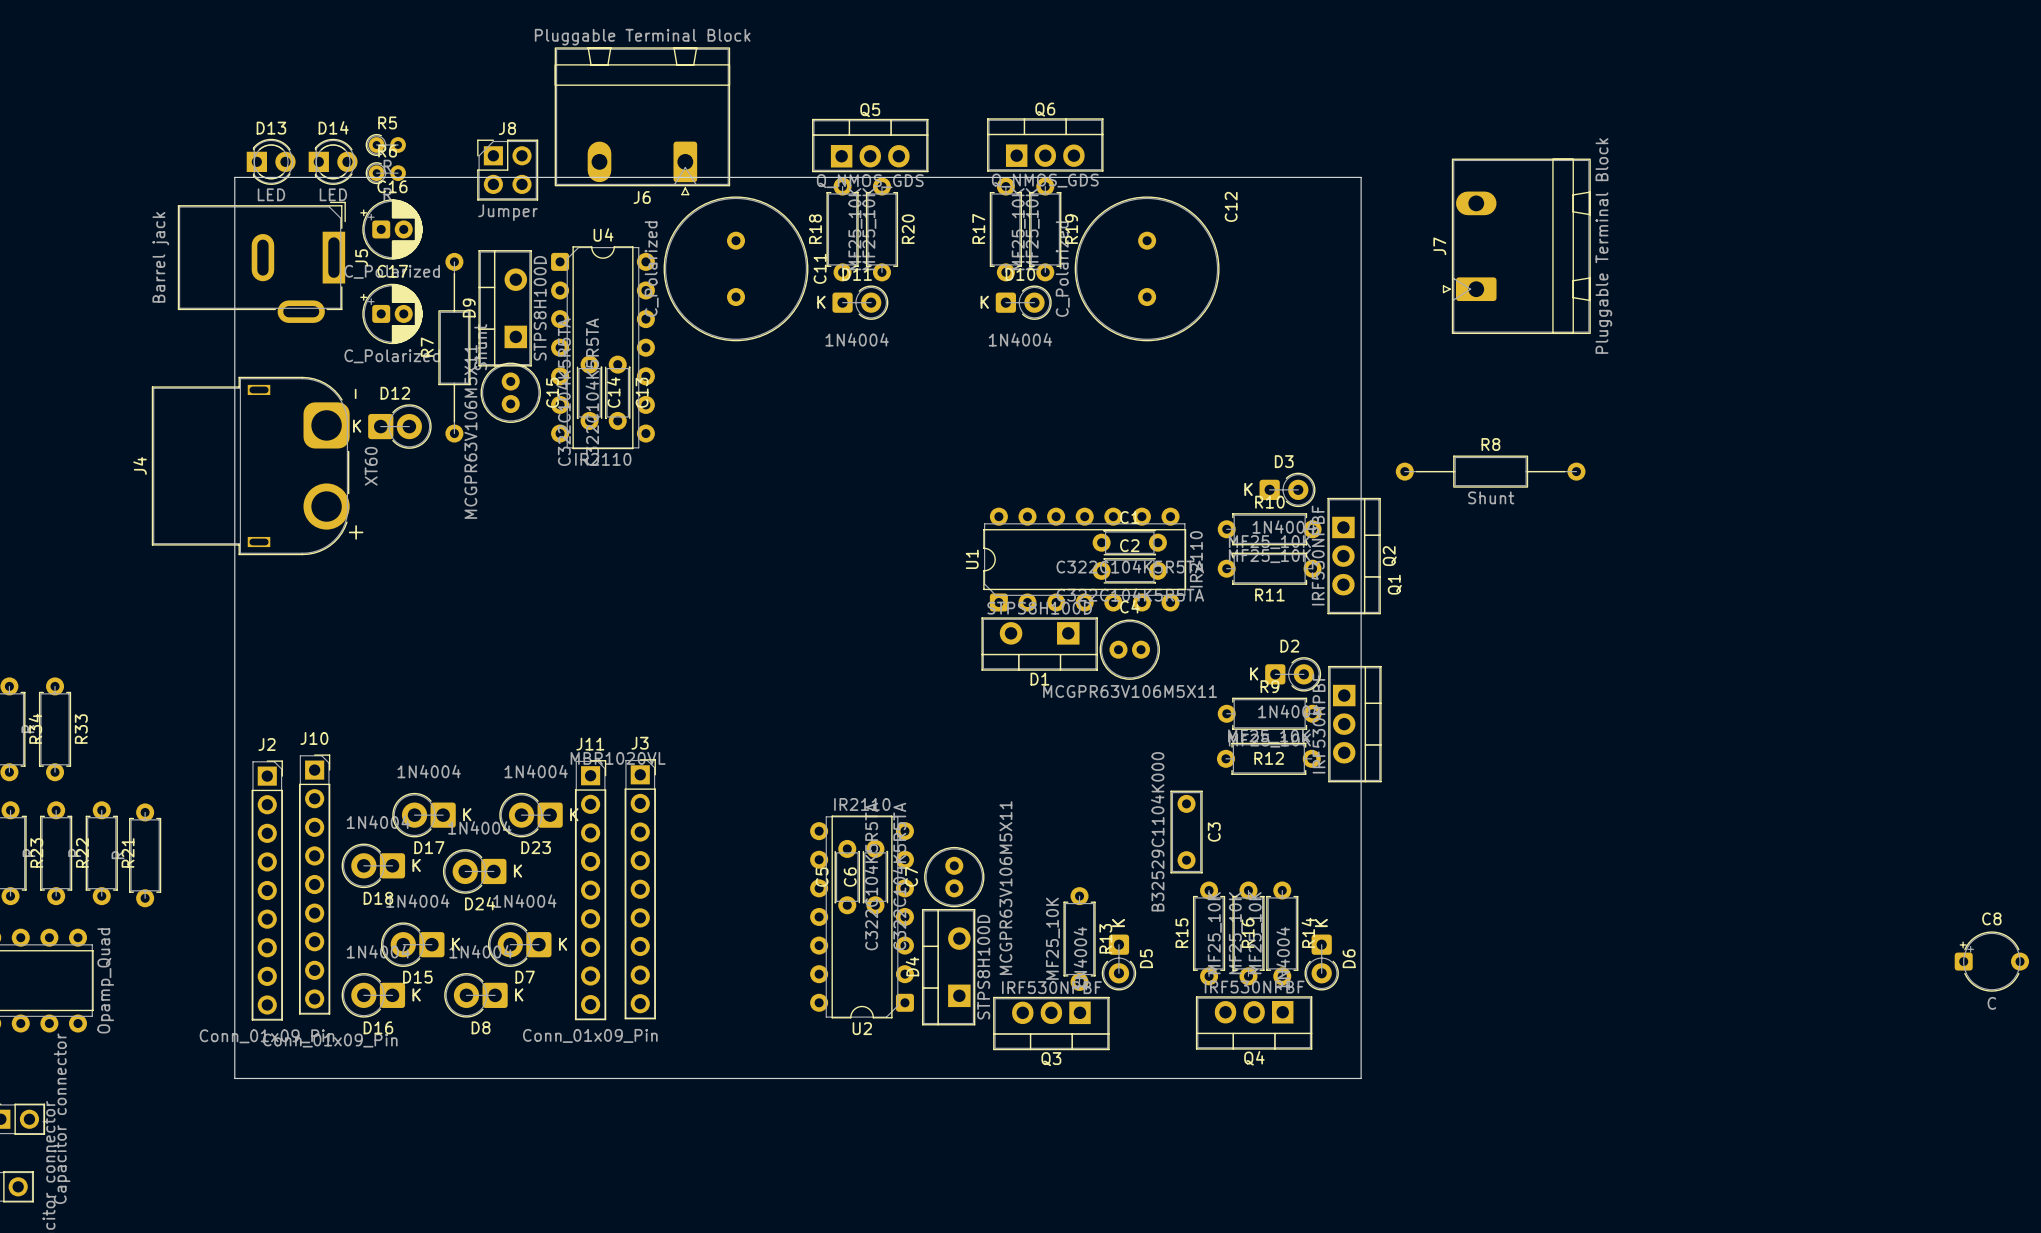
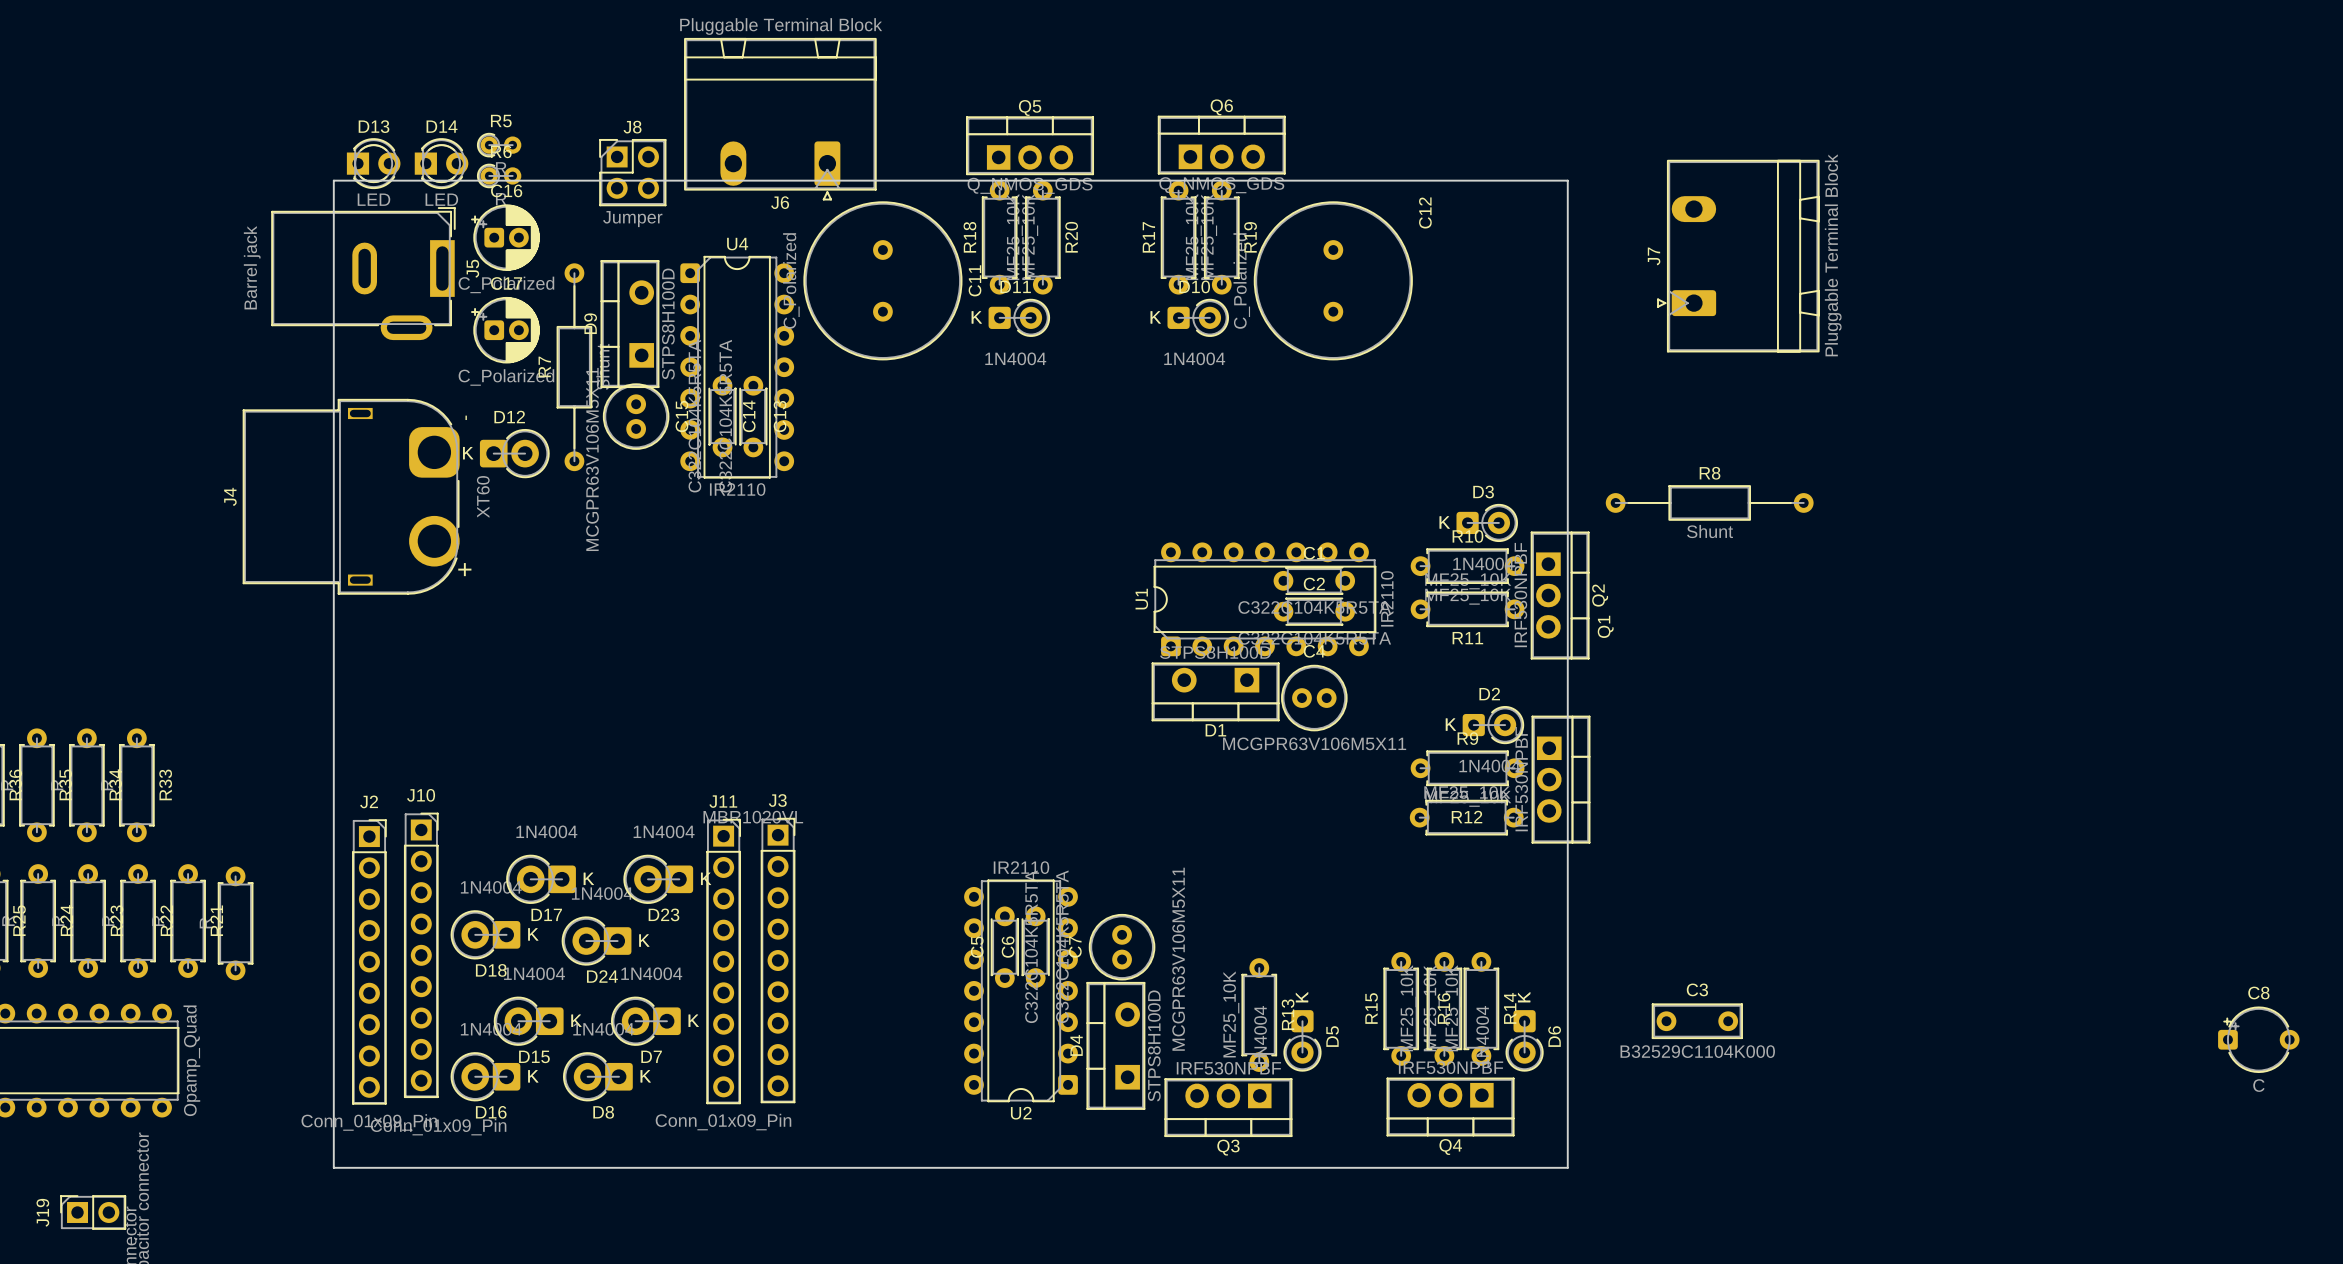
C3 value position: B32529C1104K000 (1157, 831) -> B32529C1104K000 (1697, 1051)
C3 rotation: 0° (1186, 832) -> 90° clockwise (1697, 1021)
C3 position: (1186, 832) -> (1697, 1021)
C3 name position: C3 (1214, 832) -> C3 (1697, 989)

